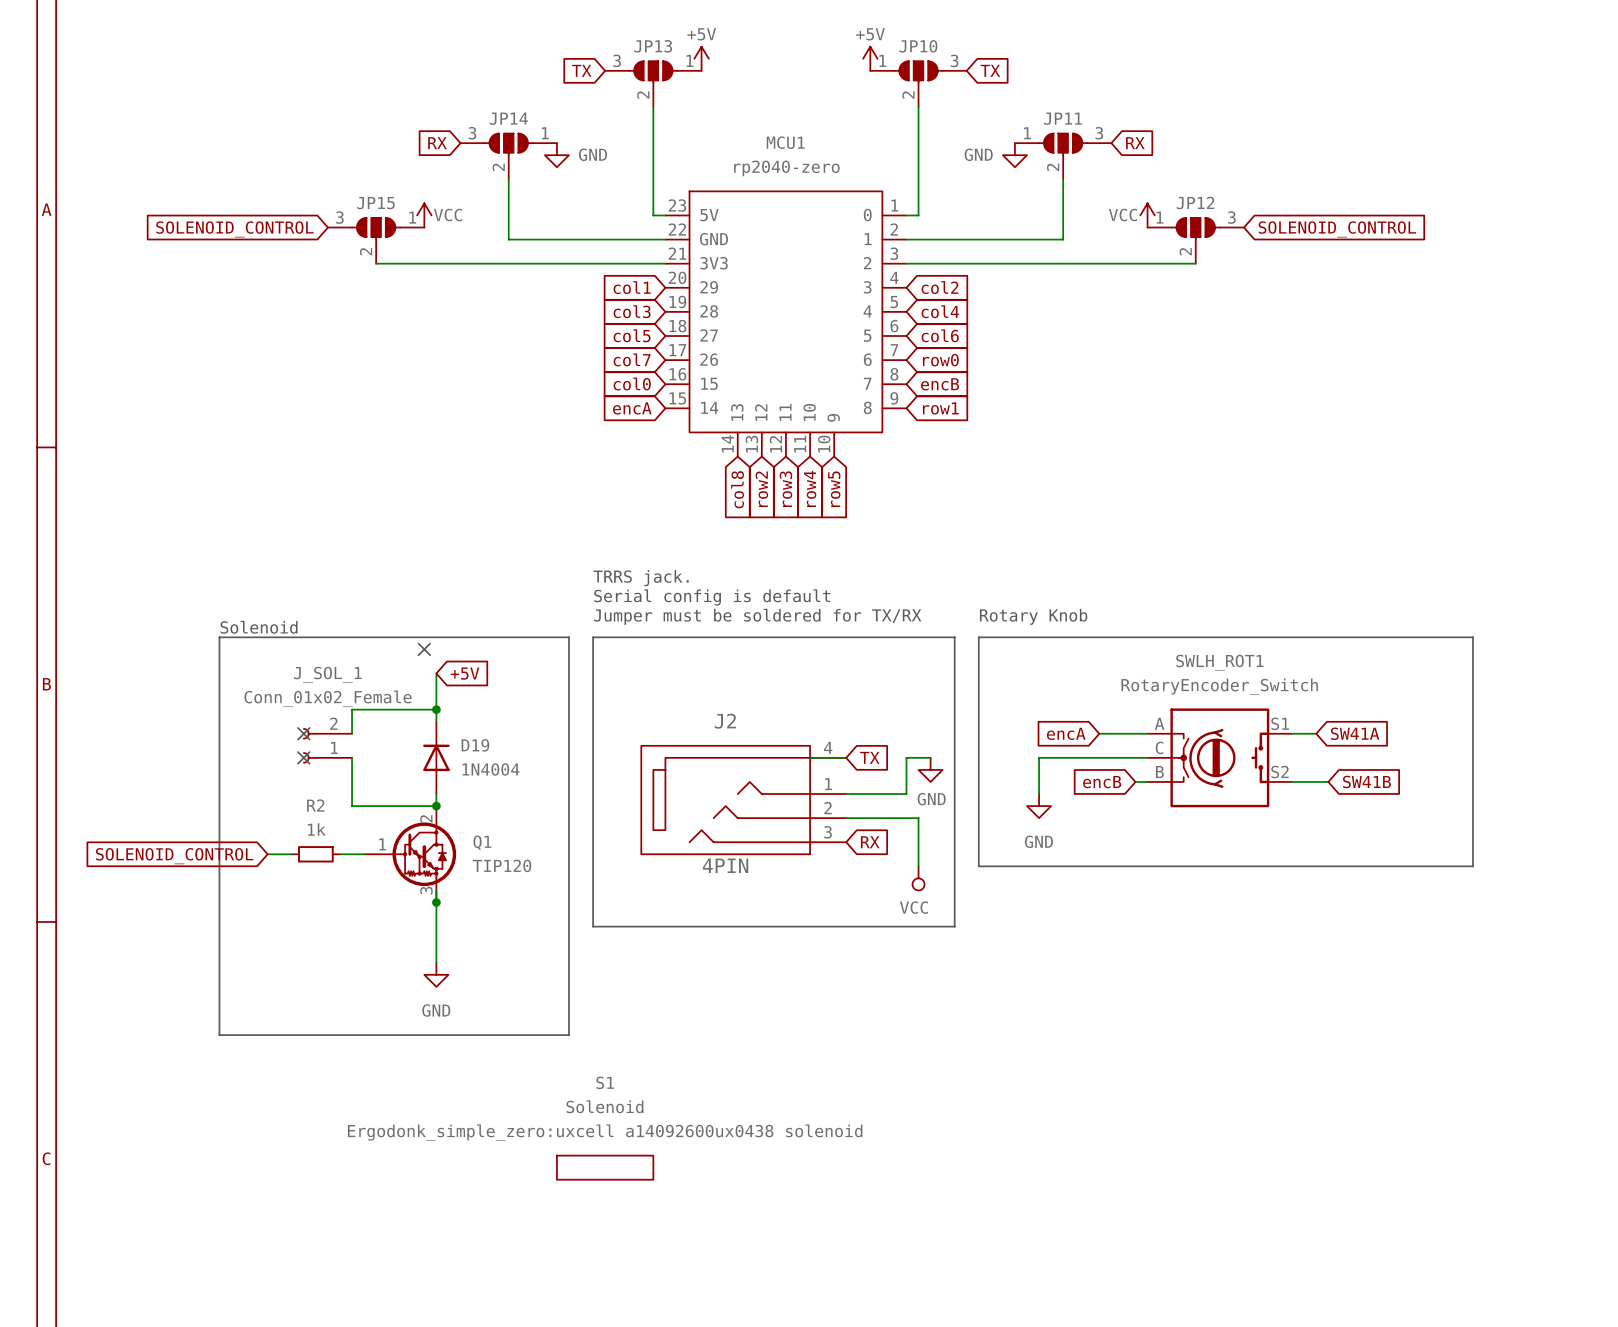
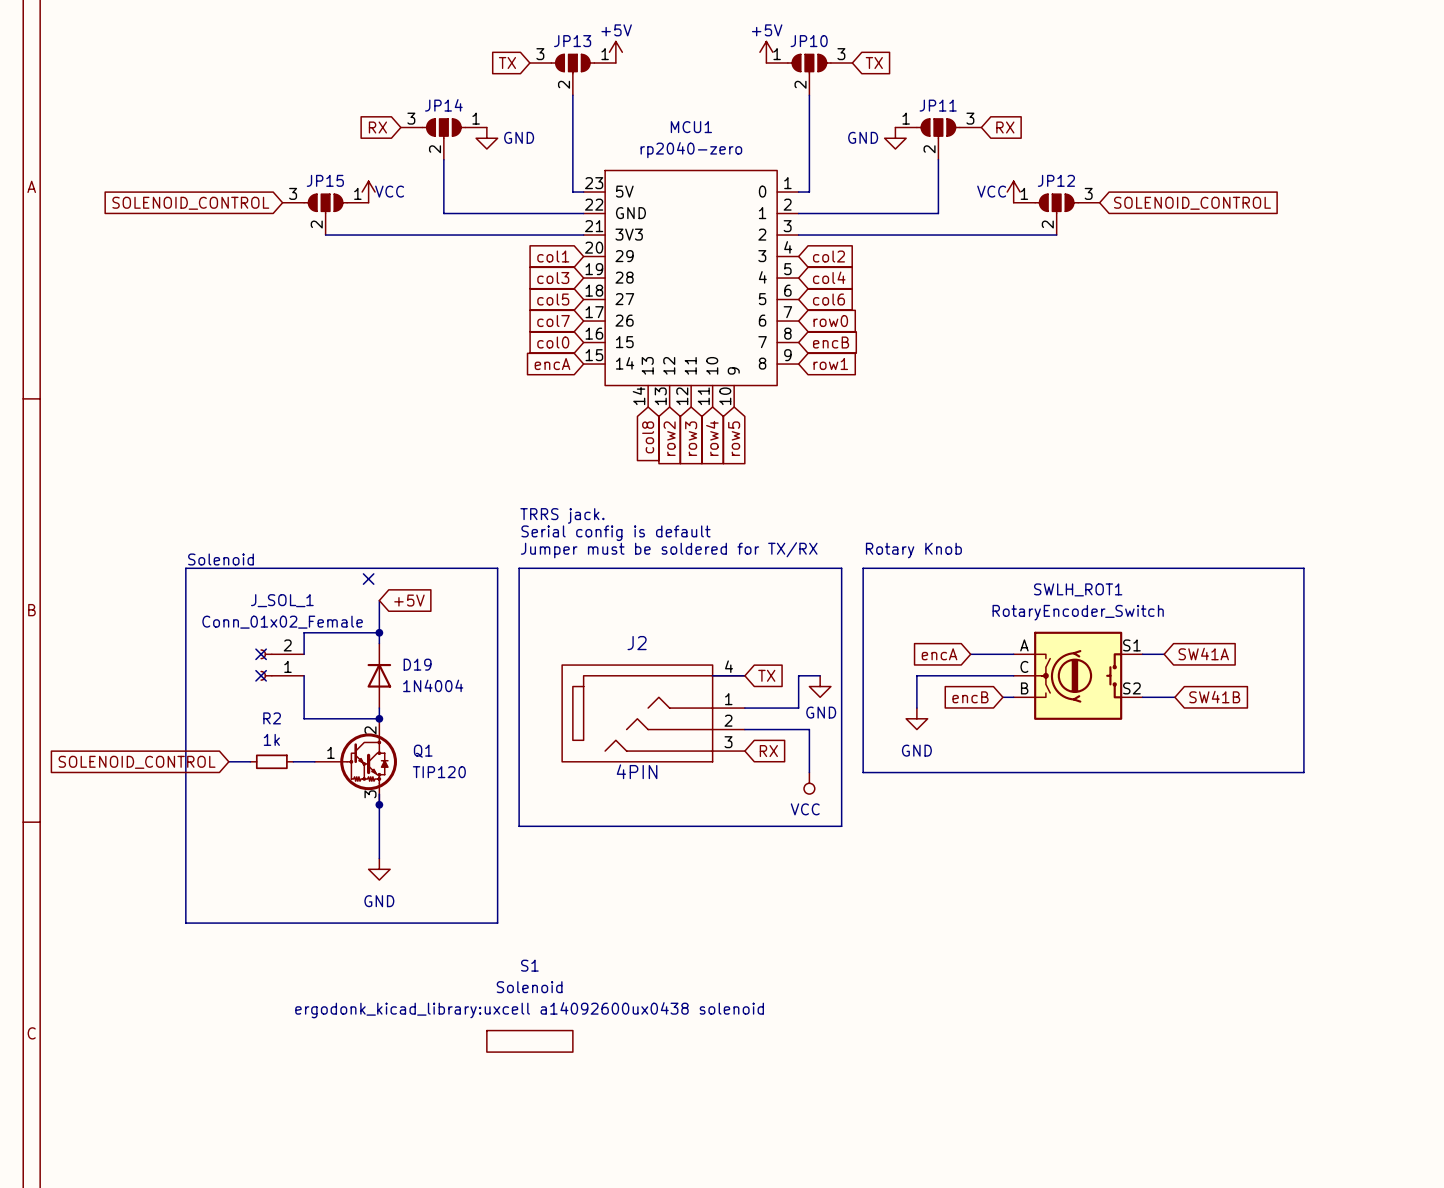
S1 text: Ergodonk_simple_zero:uxcell a14092600ux0438 solenoid (605, 1132) -> ergodonk_kicad_library:uxcell a14092600ux0438 solenoid (529, 1010)

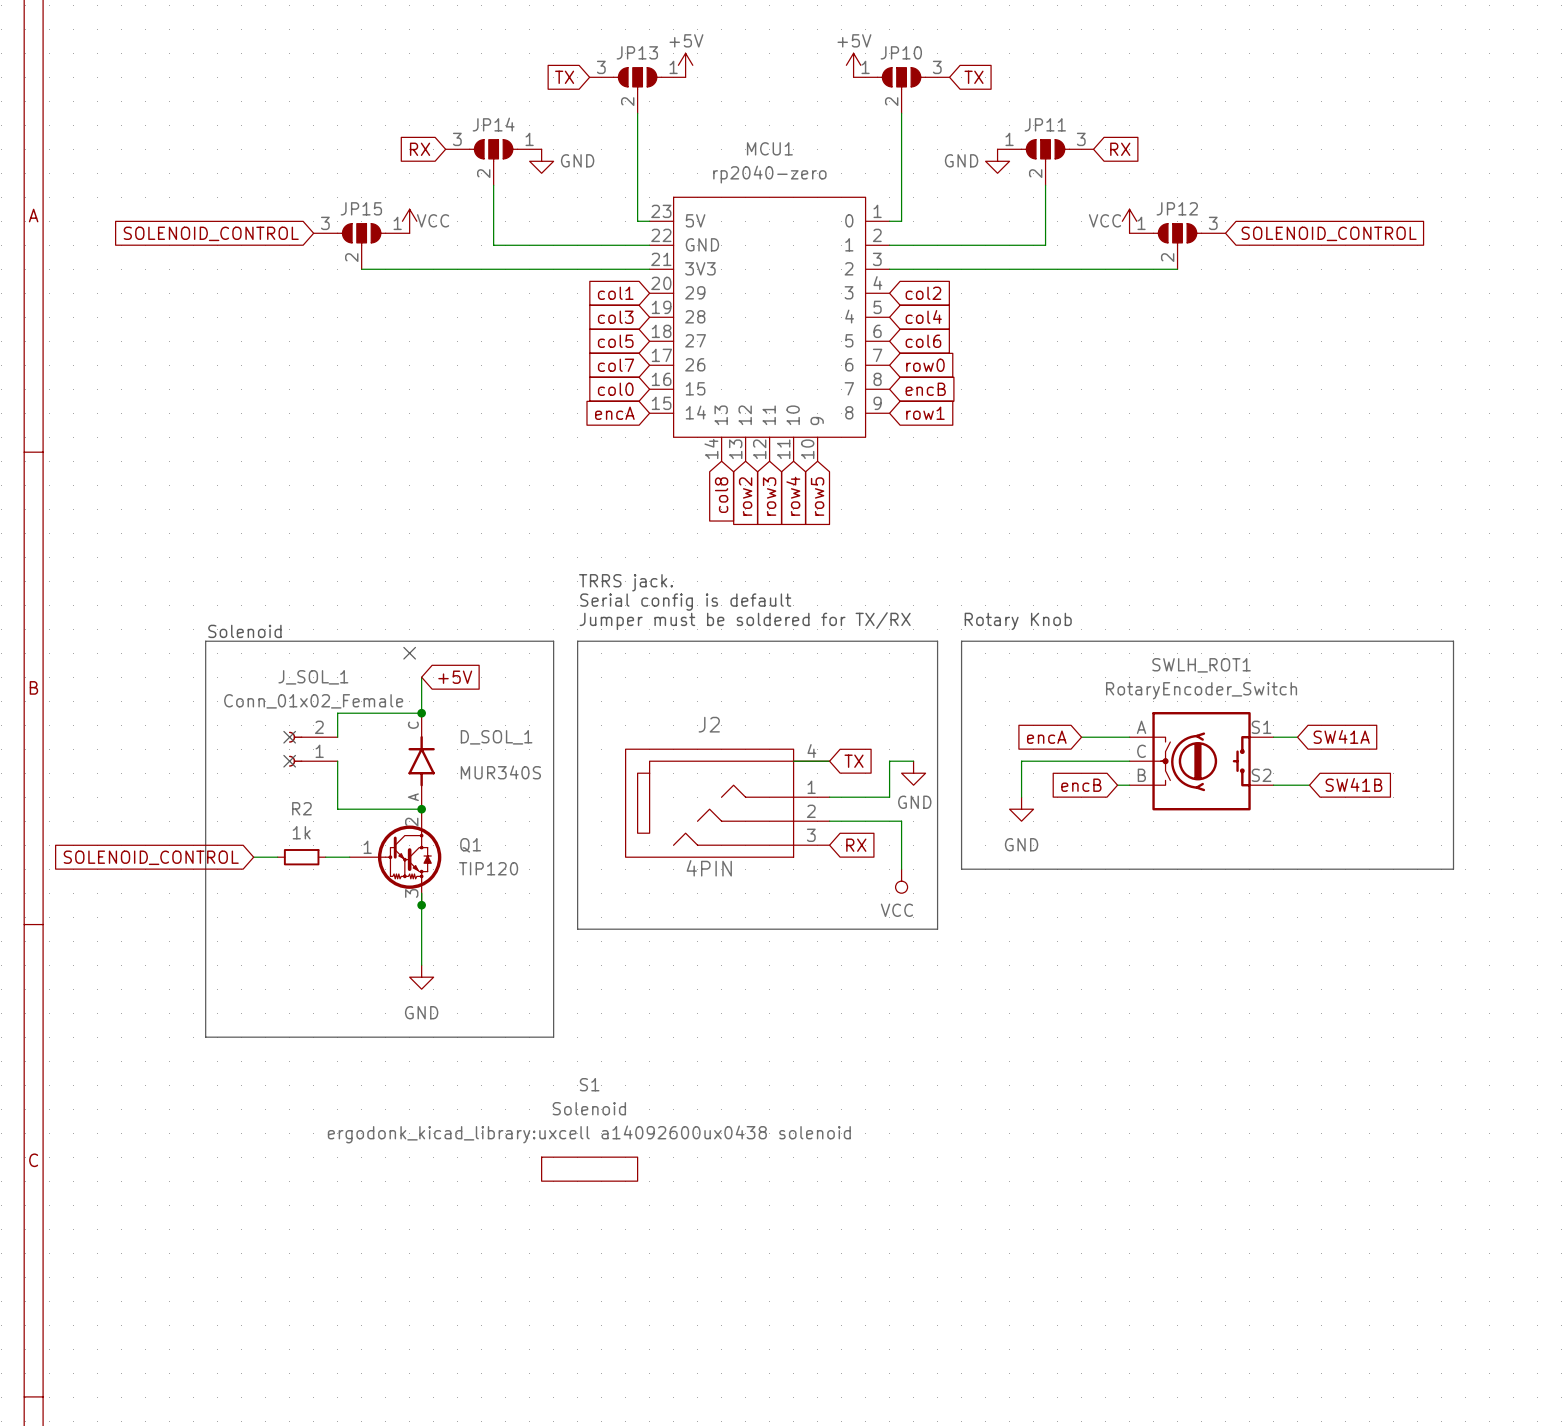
D19: 1N4004 (379, 675) -> none
D_SOL_1: none -> MUR340S (421, 761)

